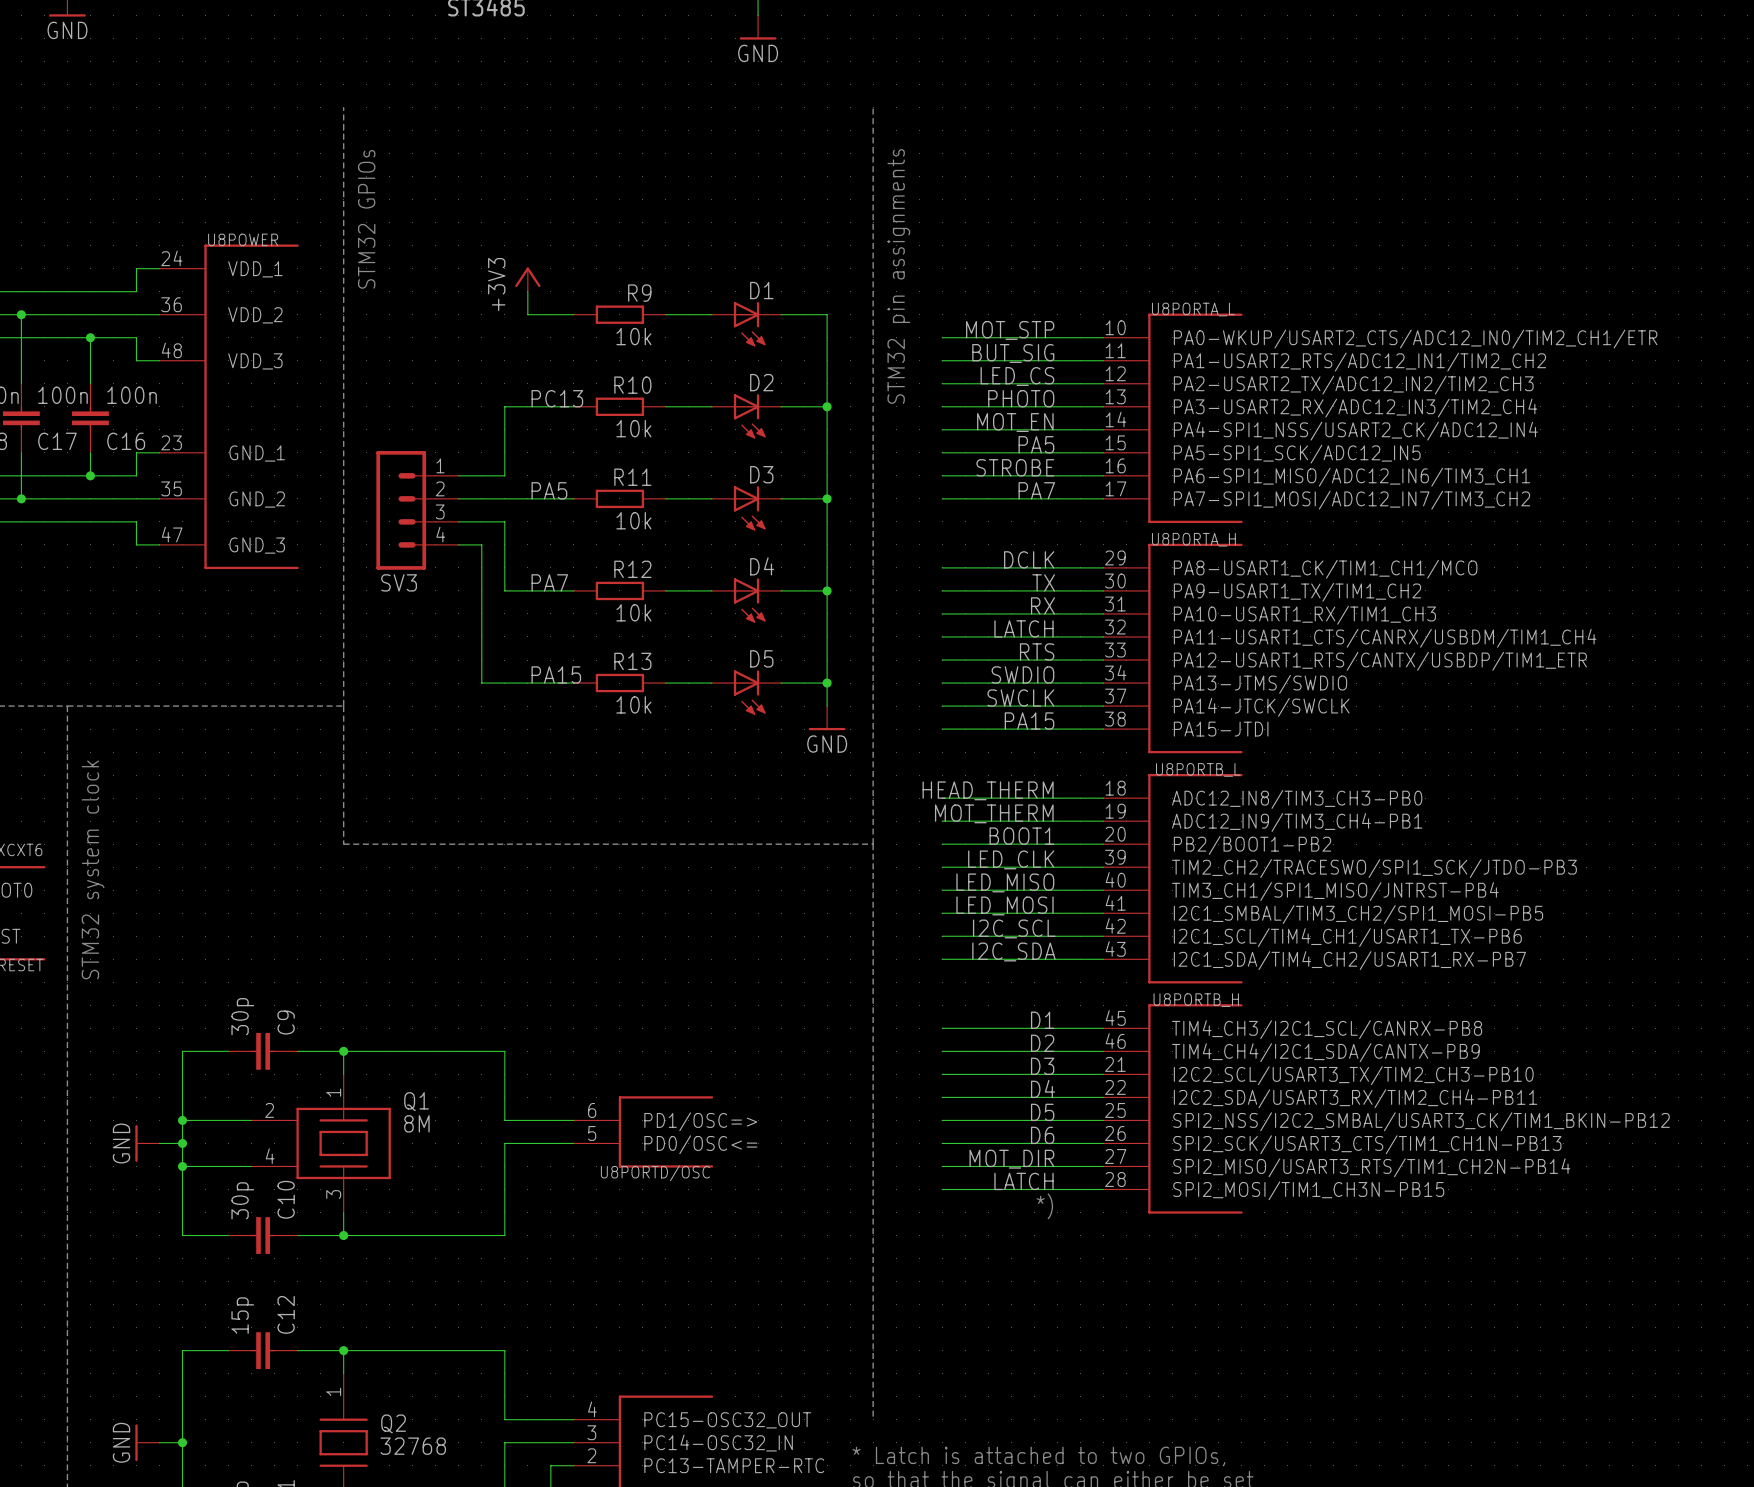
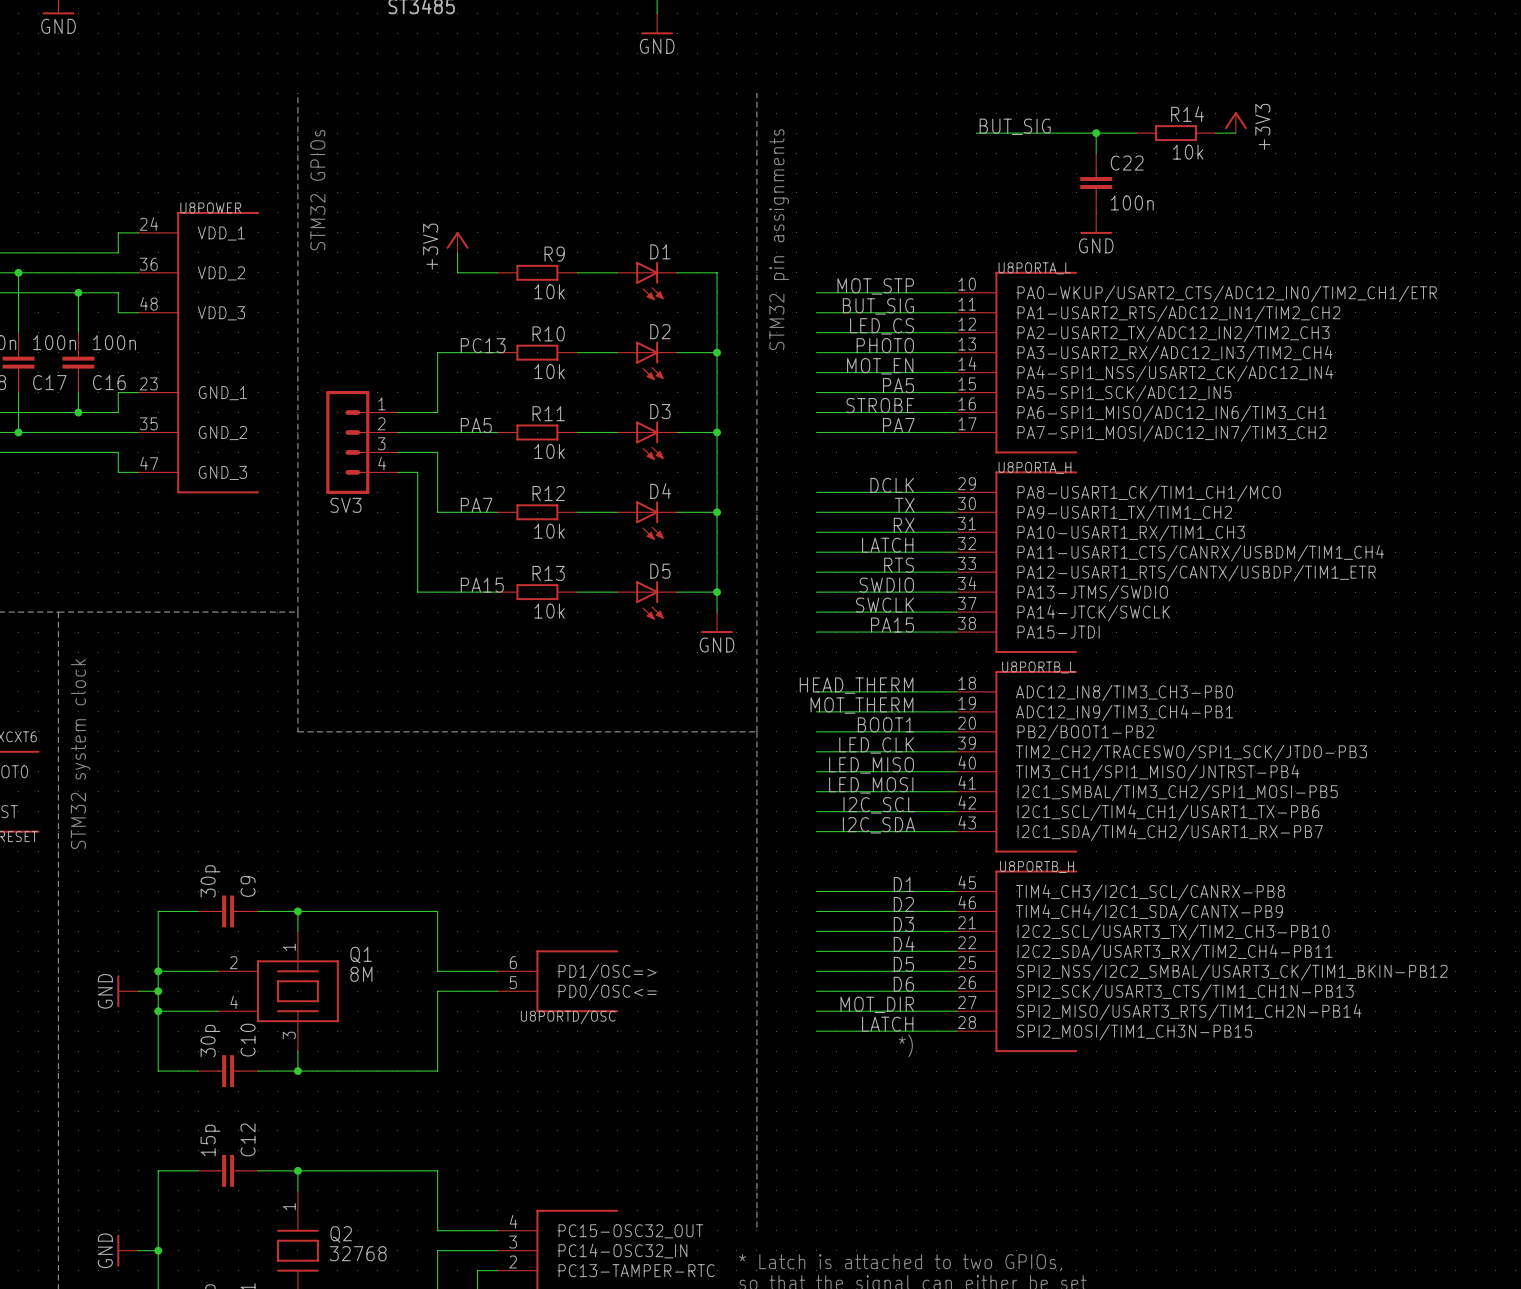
power symbol: none -> +3V3 (1235, 122)
label: none -> BUT_SIG (1015, 126)
wire: none -> (976, 133) (1136, 133)
wire: none -> (1096, 133) (1096, 153)
junction: none -> (1096, 133)
R14: none -> 10k (1176, 133)
wire: none -> (1215, 133) (1235, 133)
C22: none -> 100n (1096, 183)
power symbol: none -> GND (1096, 223)

